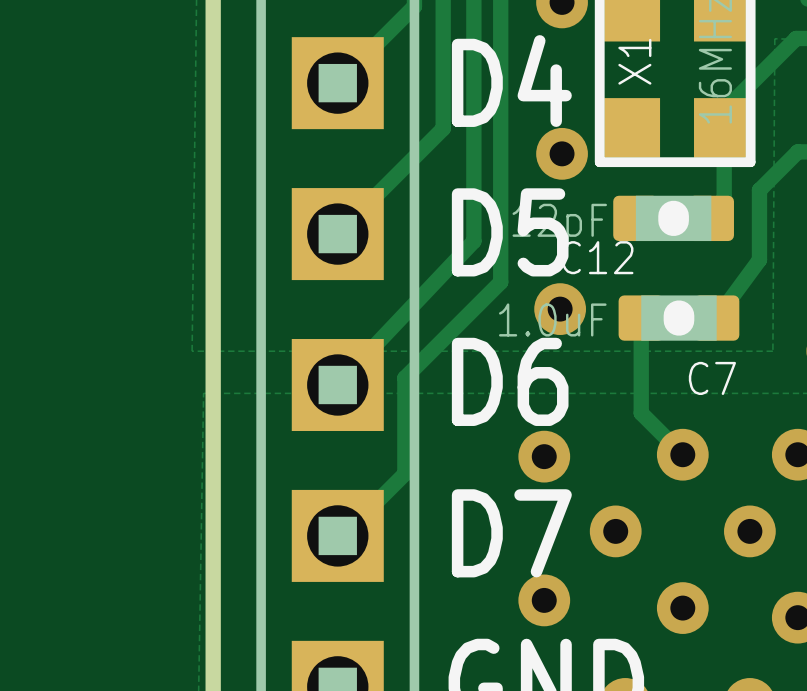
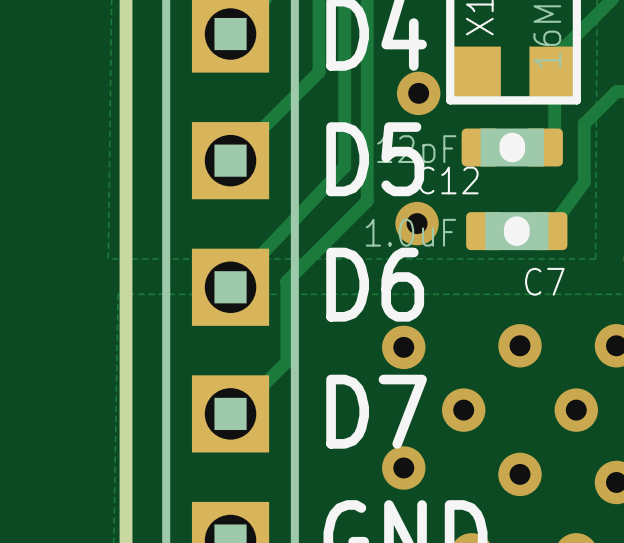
track: (641, 318) (641, 413) (682, 454) -> none

